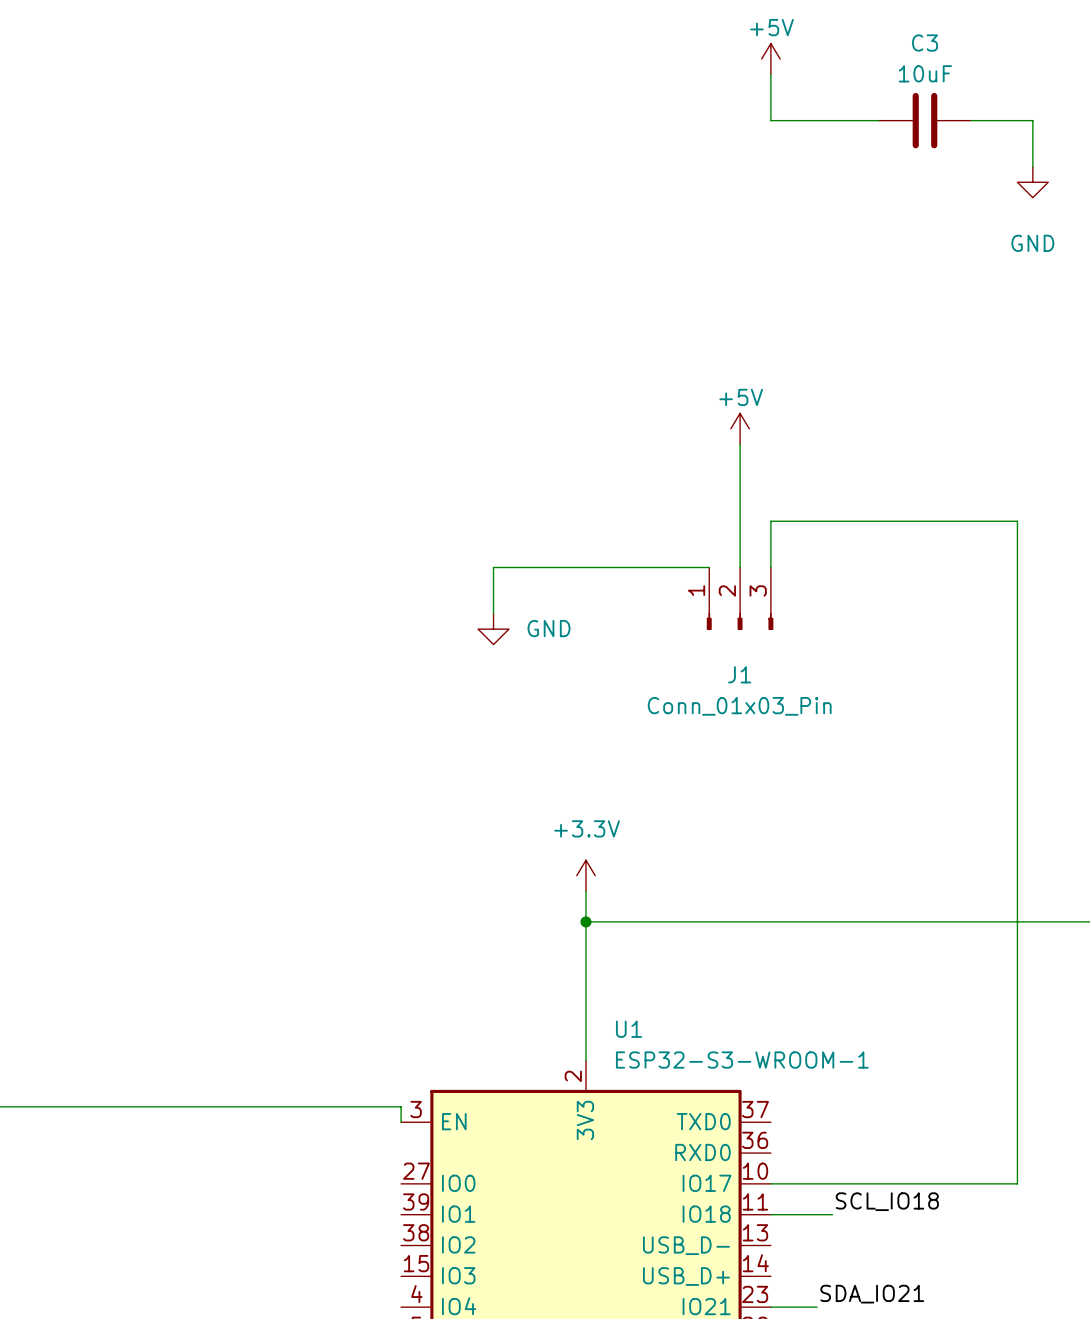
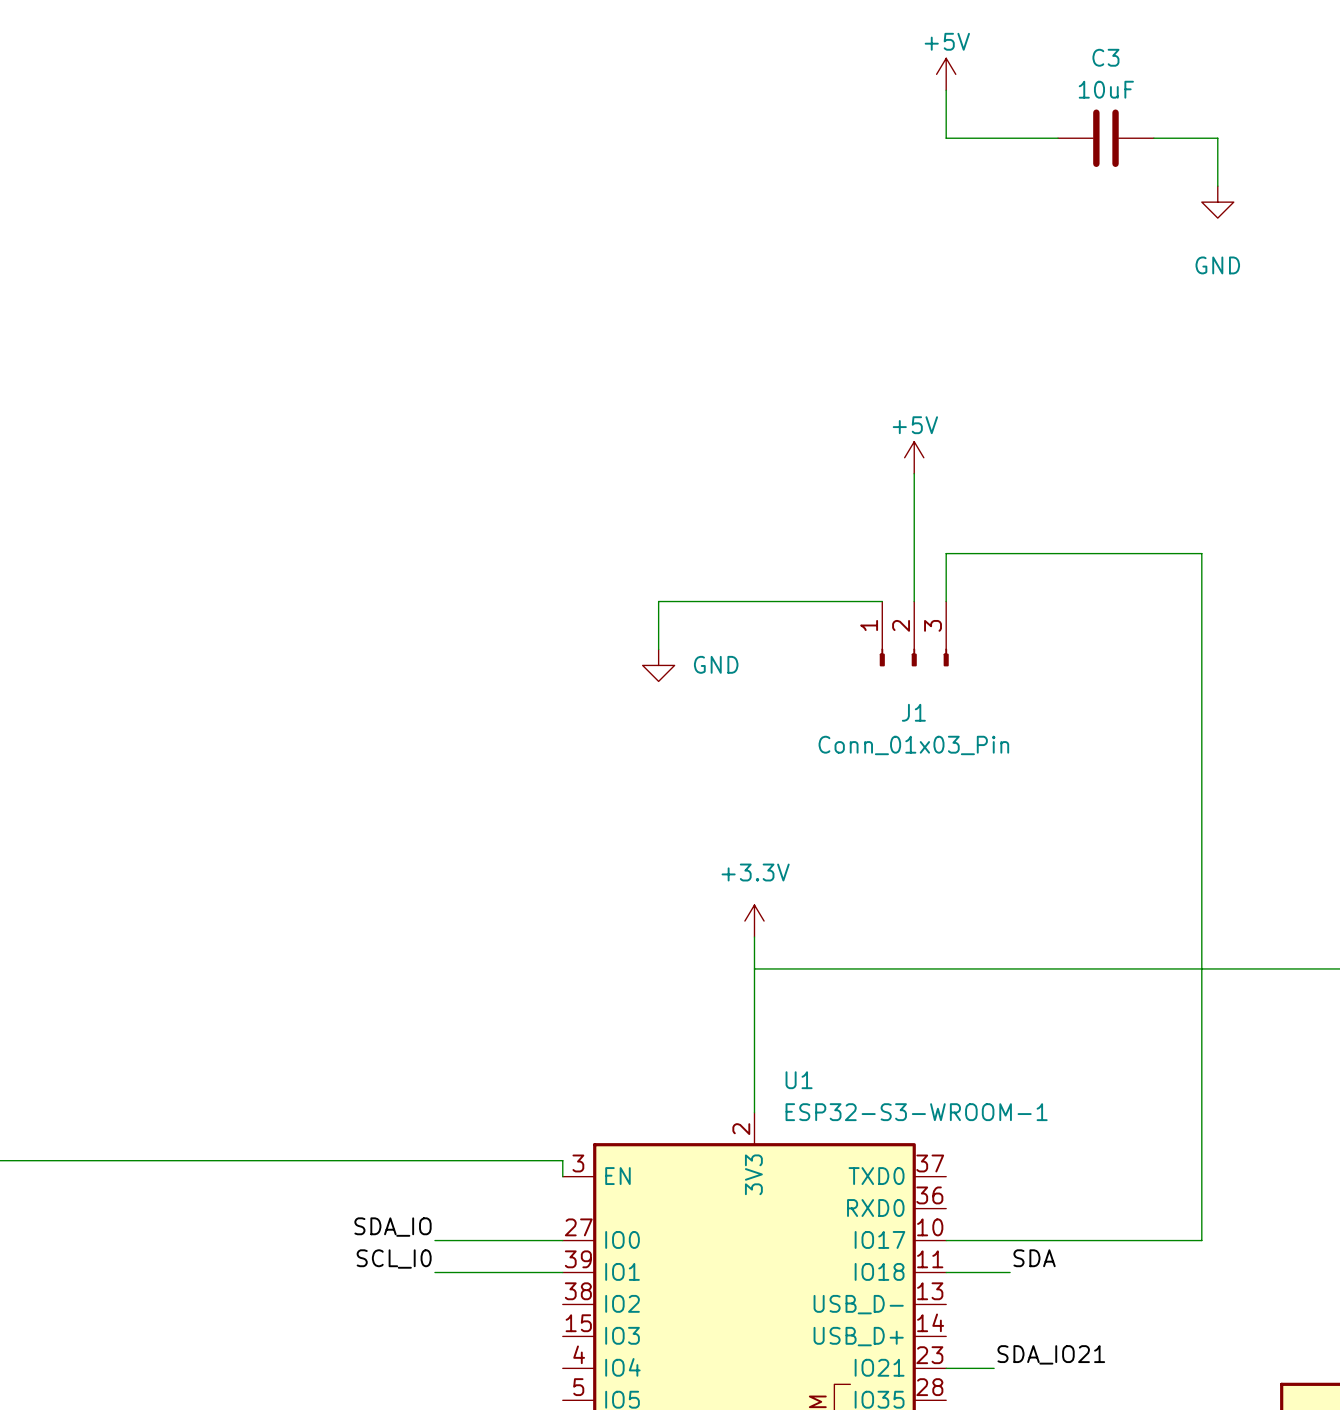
junction: (585, 921) -> none
label: none -> SDA_IO (393, 1227)
wire: none -> (434, 1240) (562, 1240)
label: none -> SCL_I0 (394, 1259)
label: SCL_IO18 (887, 1201) -> SDA (1034, 1258)
wire: none -> (434, 1272) (562, 1272)

